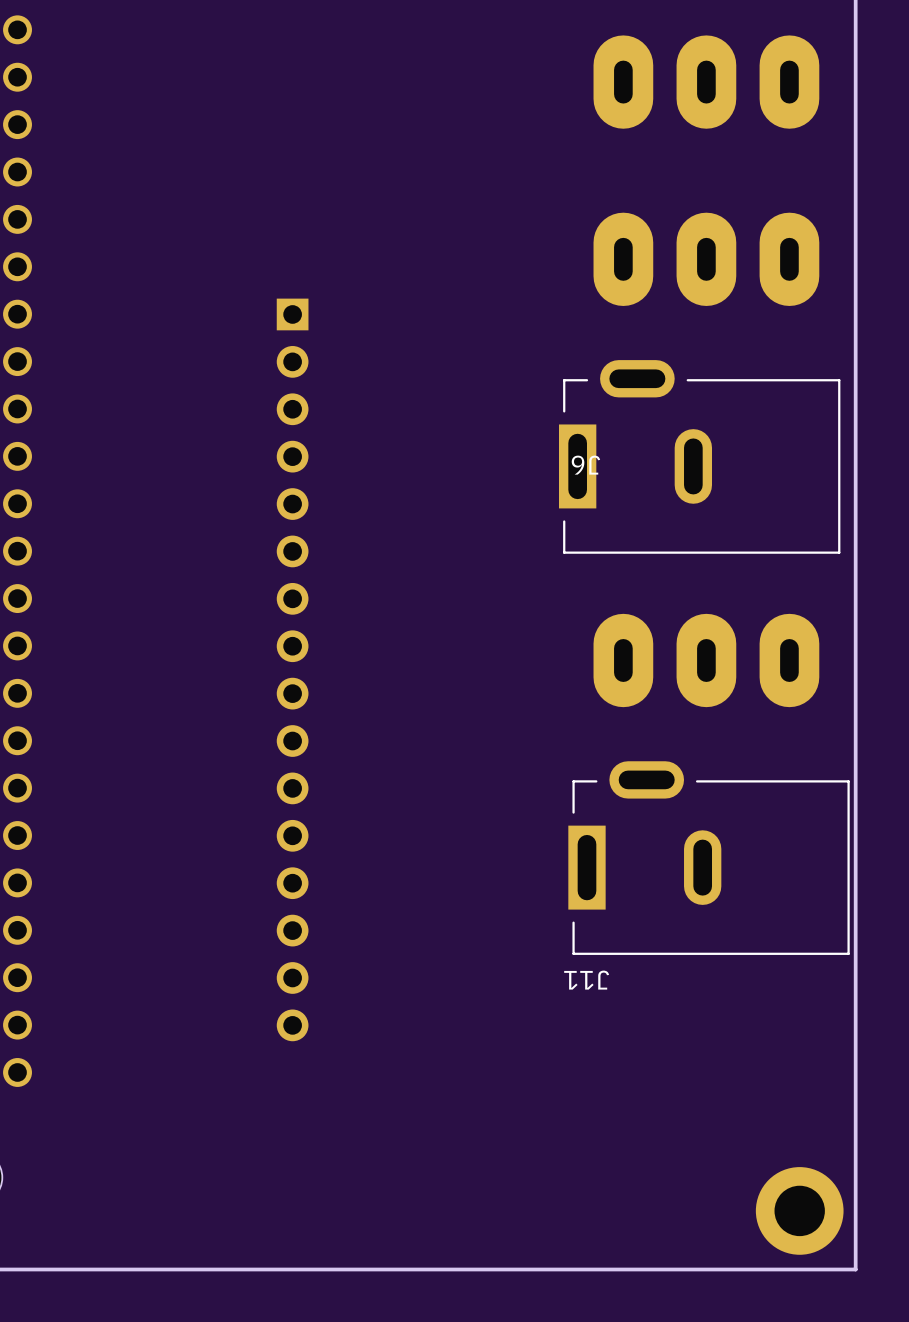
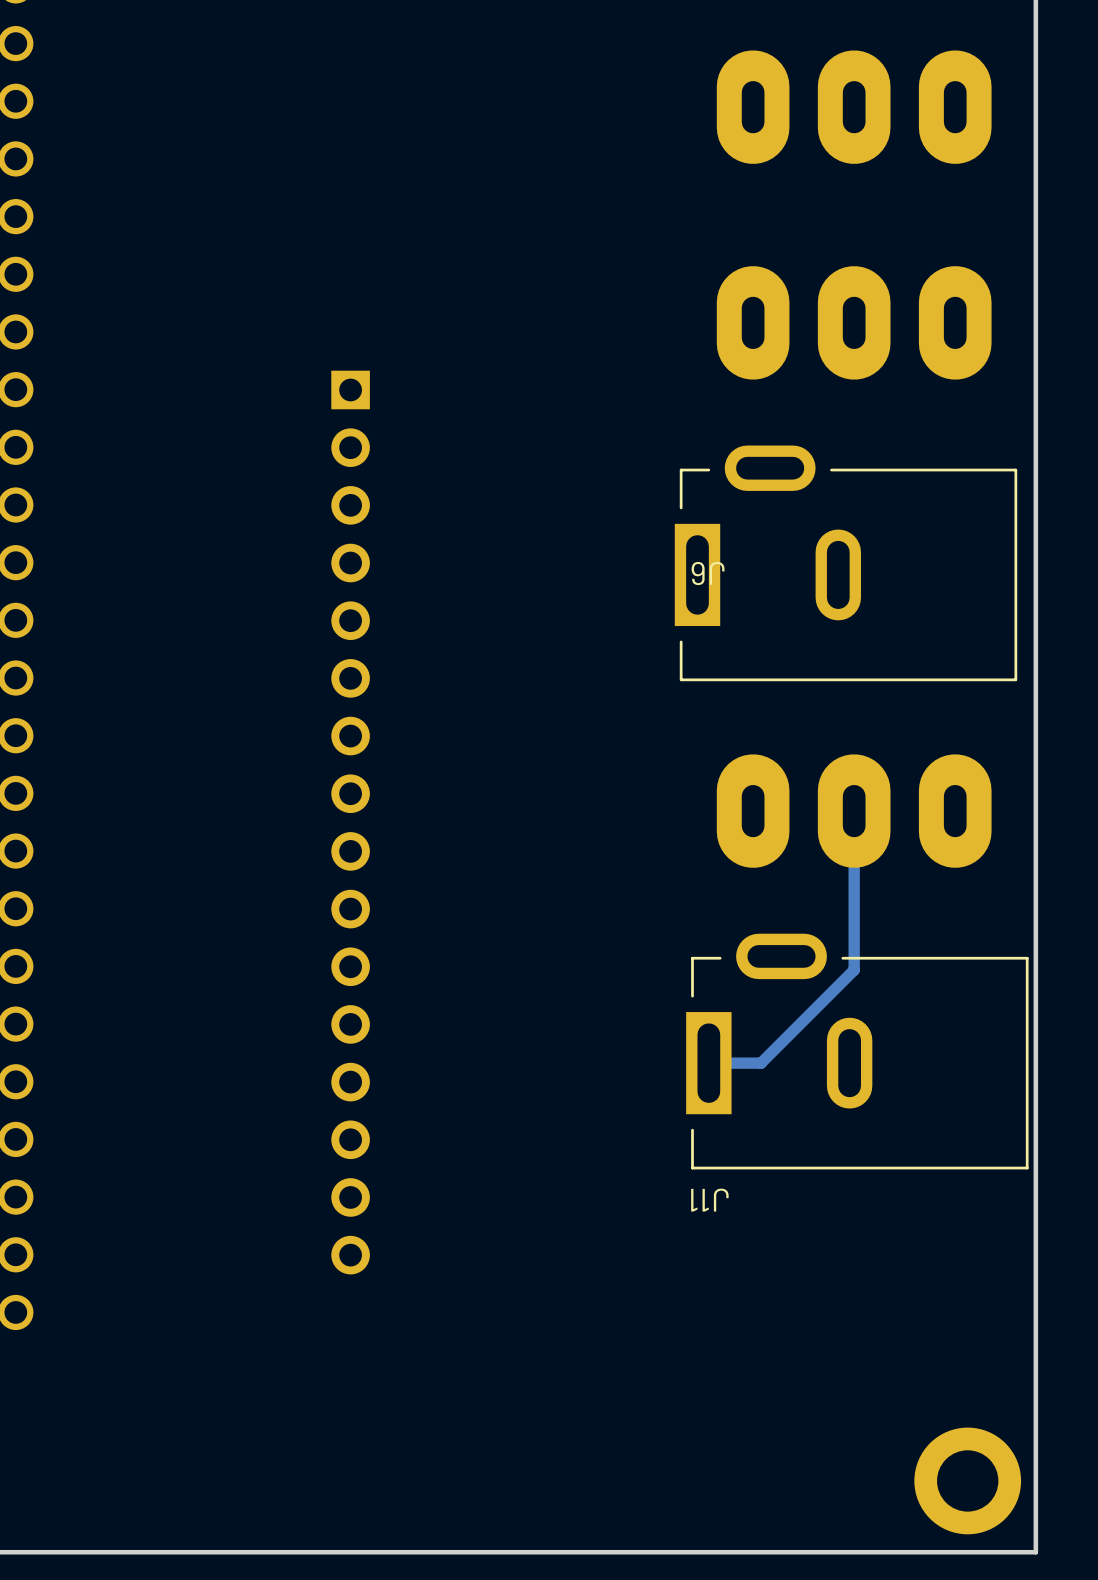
track: none -> (854, 811) (854, 970) (761, 1063) (708, 1063)

